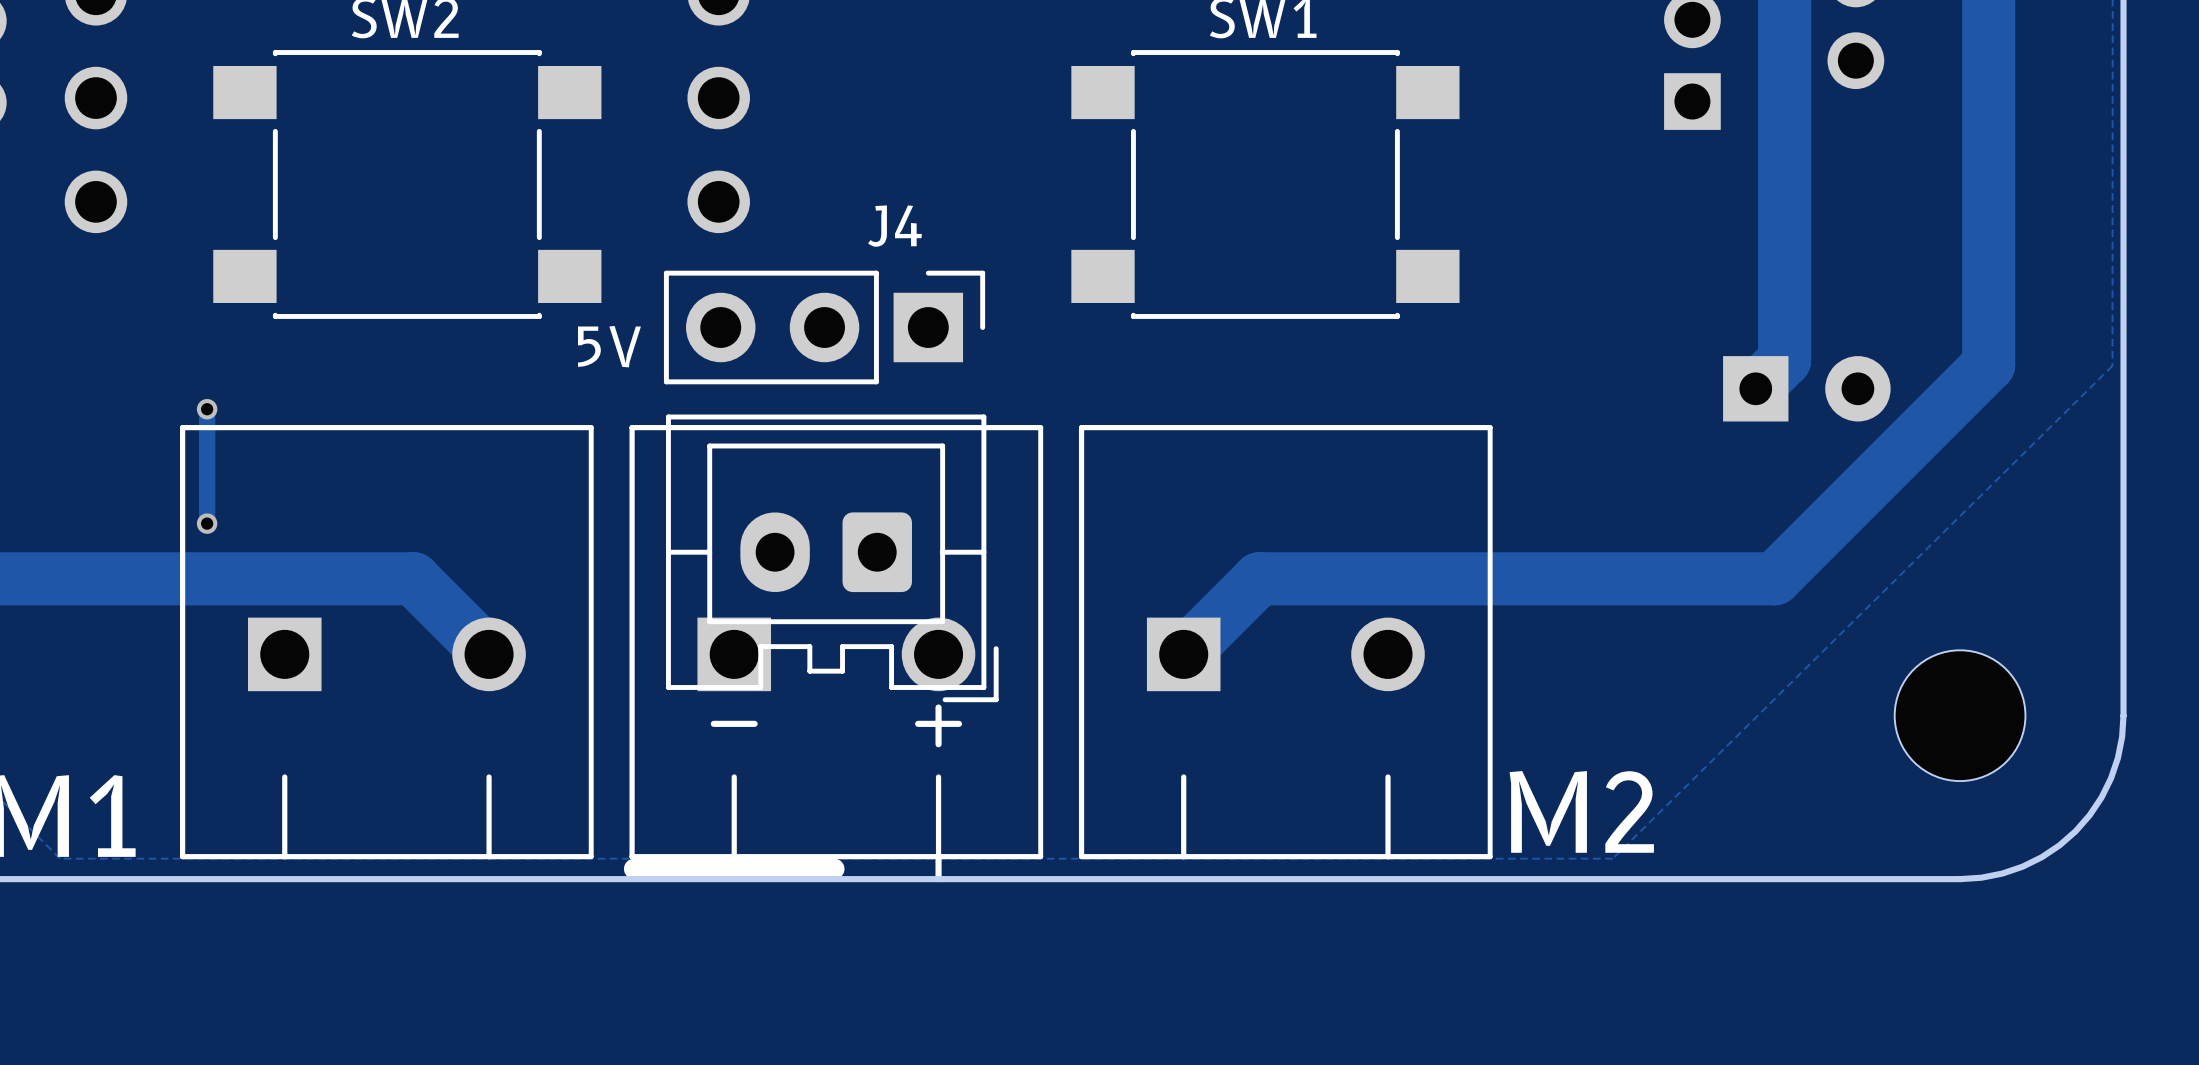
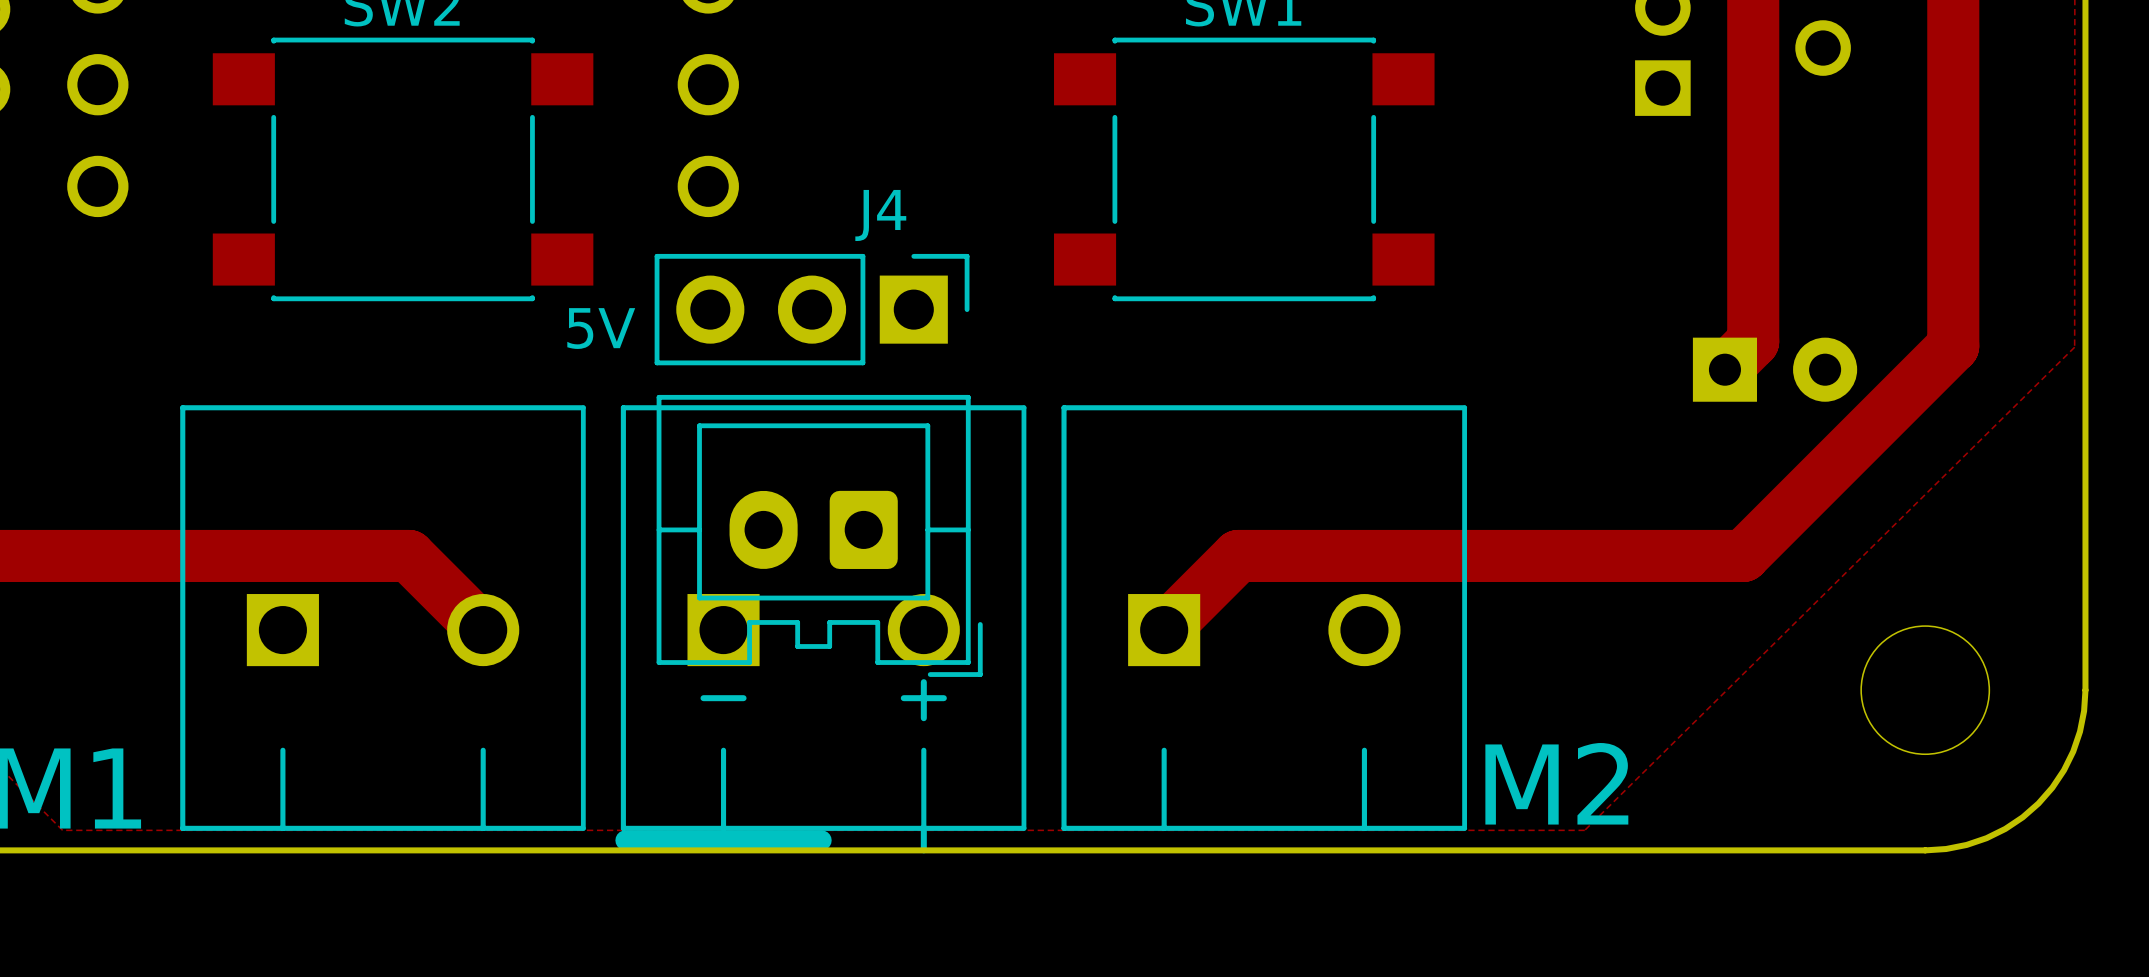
track: (207, 409) (207, 523) -> none
via: (207, 409) -> none
via: (207, 523) -> none

